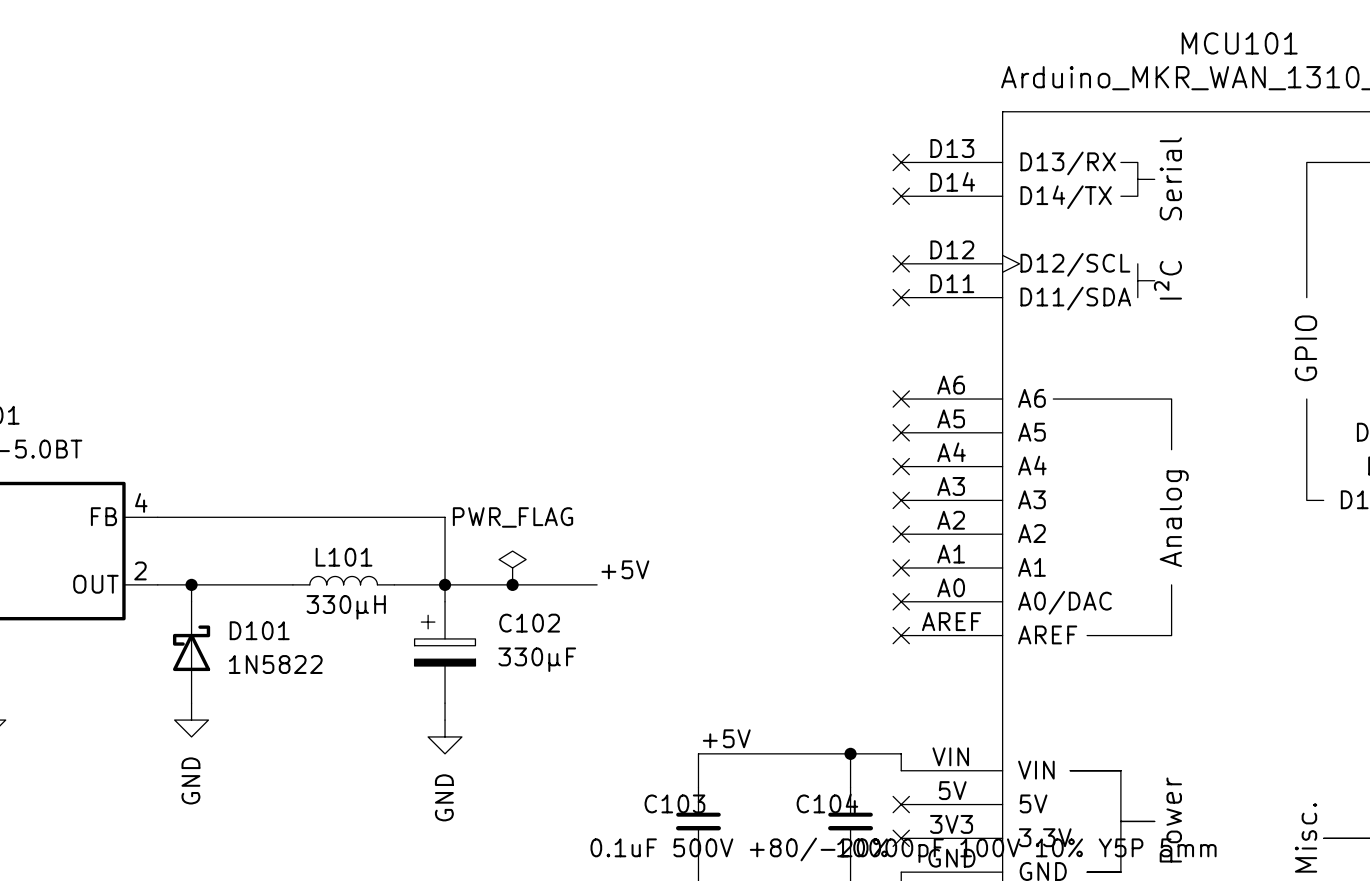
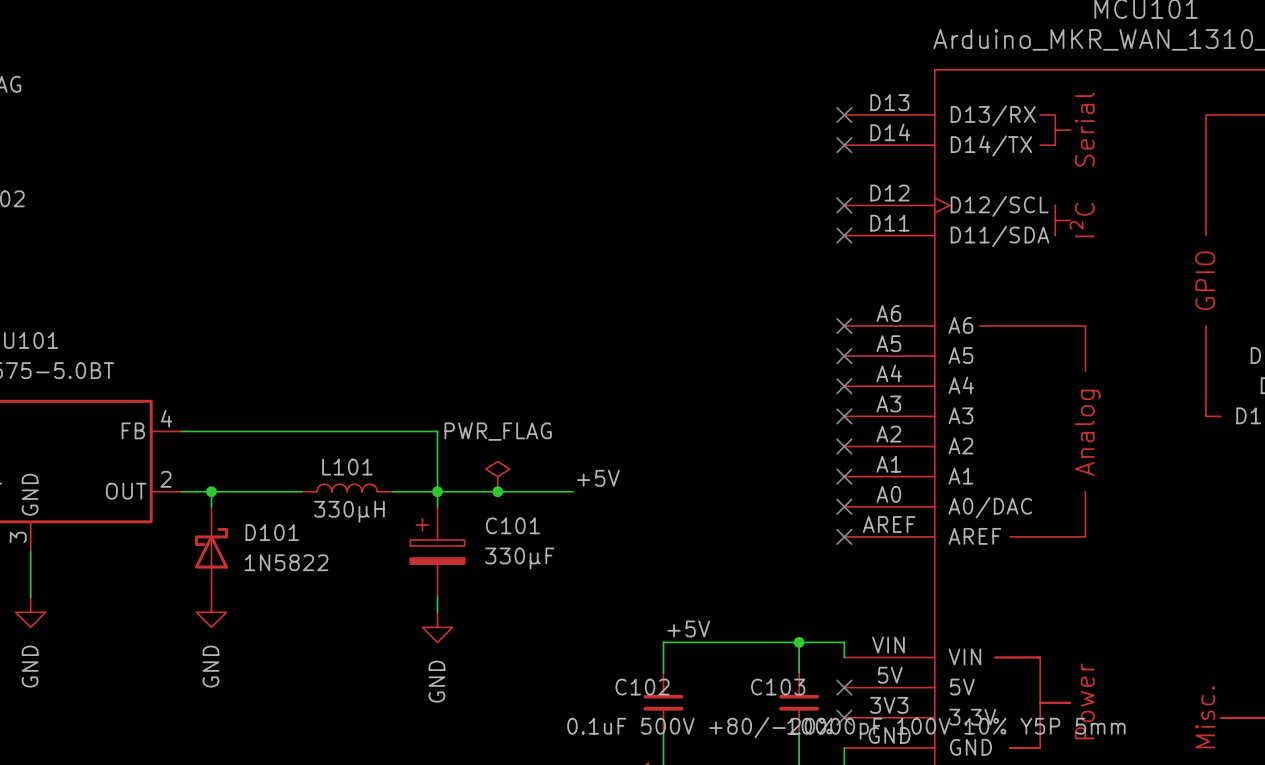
C102 name: C102 (529, 623) -> C101 (512, 525)
C103 name: C103 (674, 803) -> C102 (642, 687)
C104 name: C104 (827, 803) -> C103 (778, 687)

